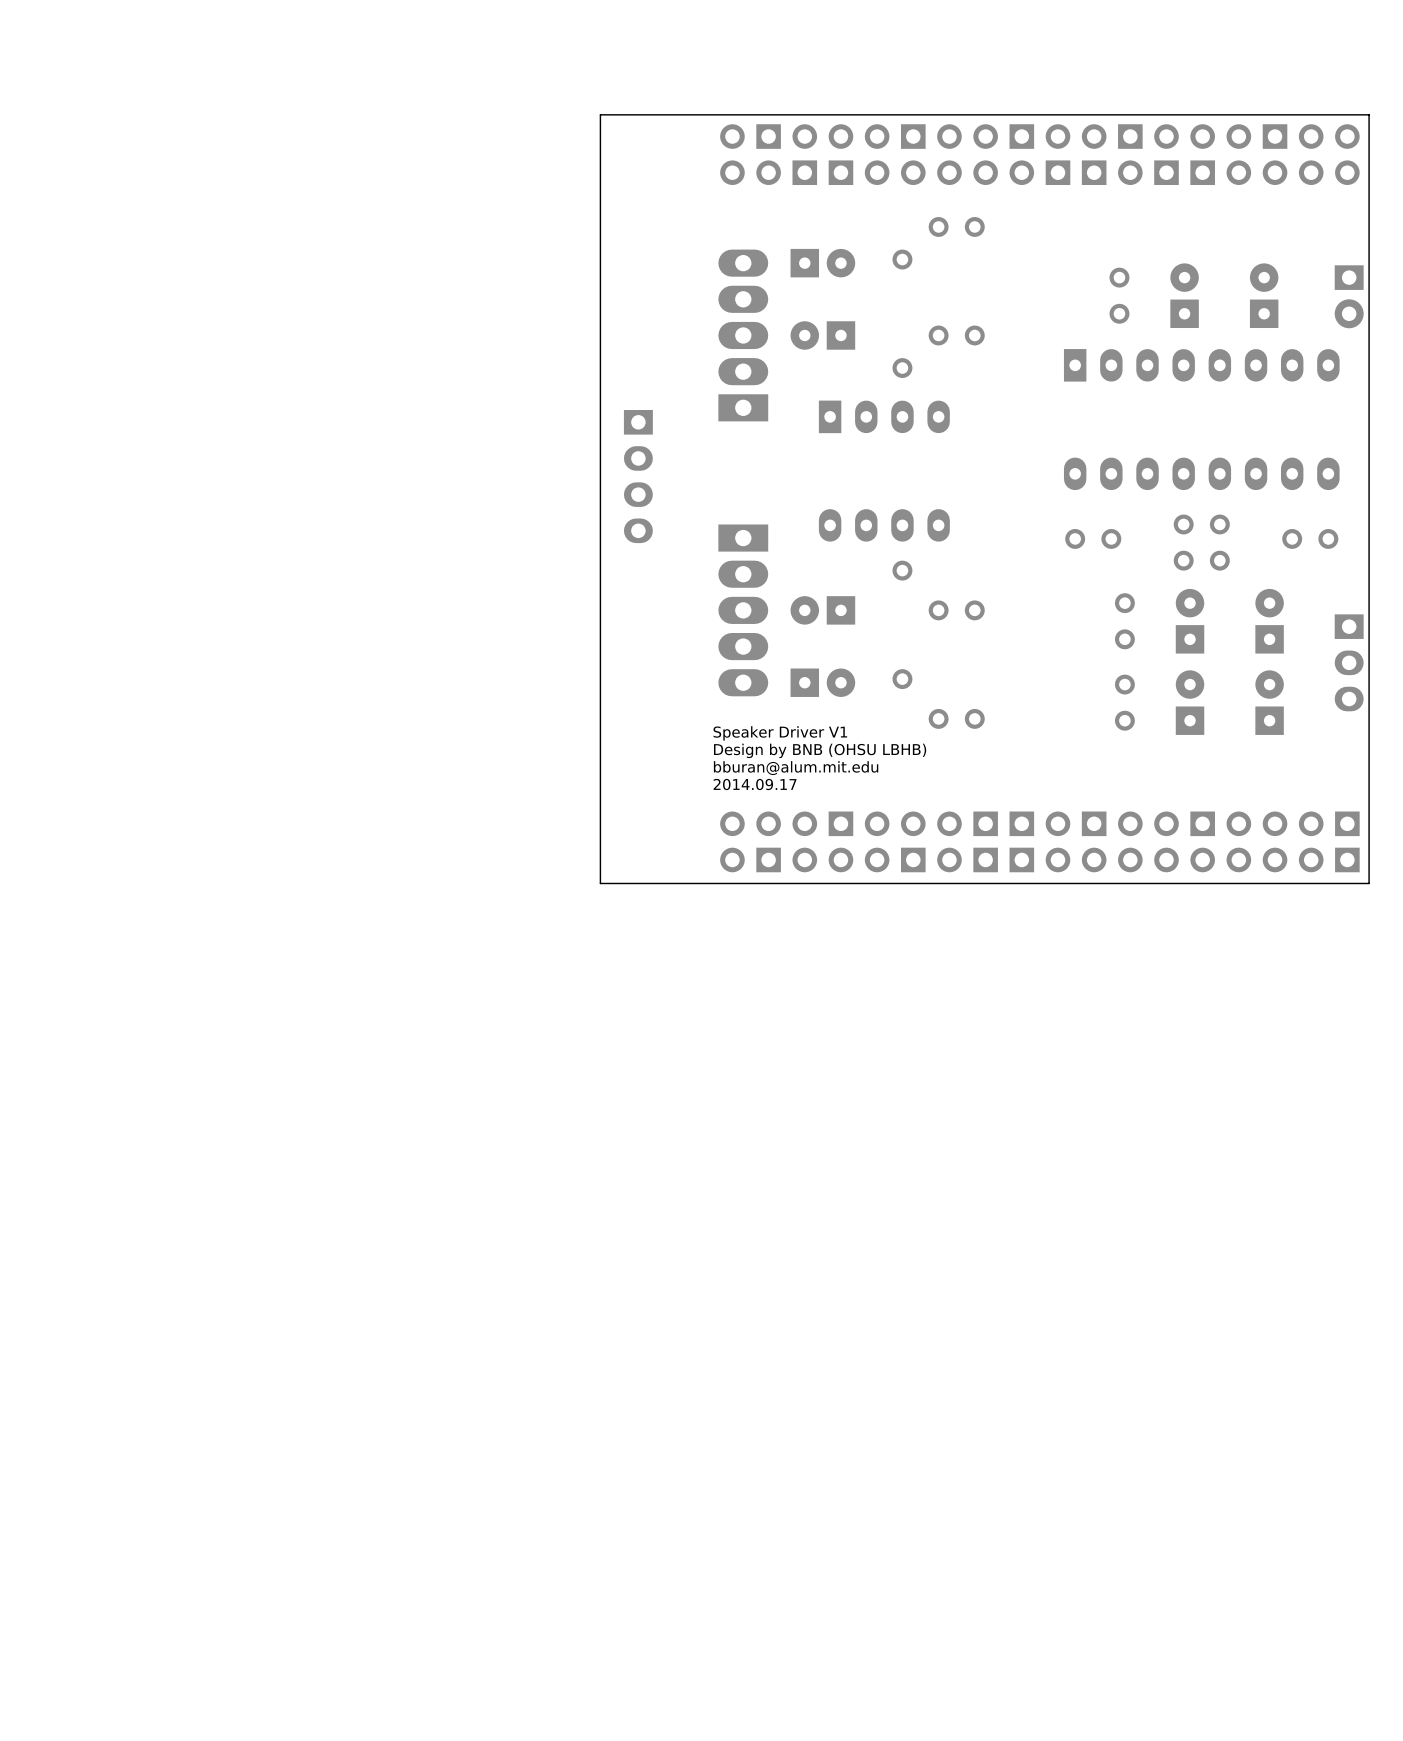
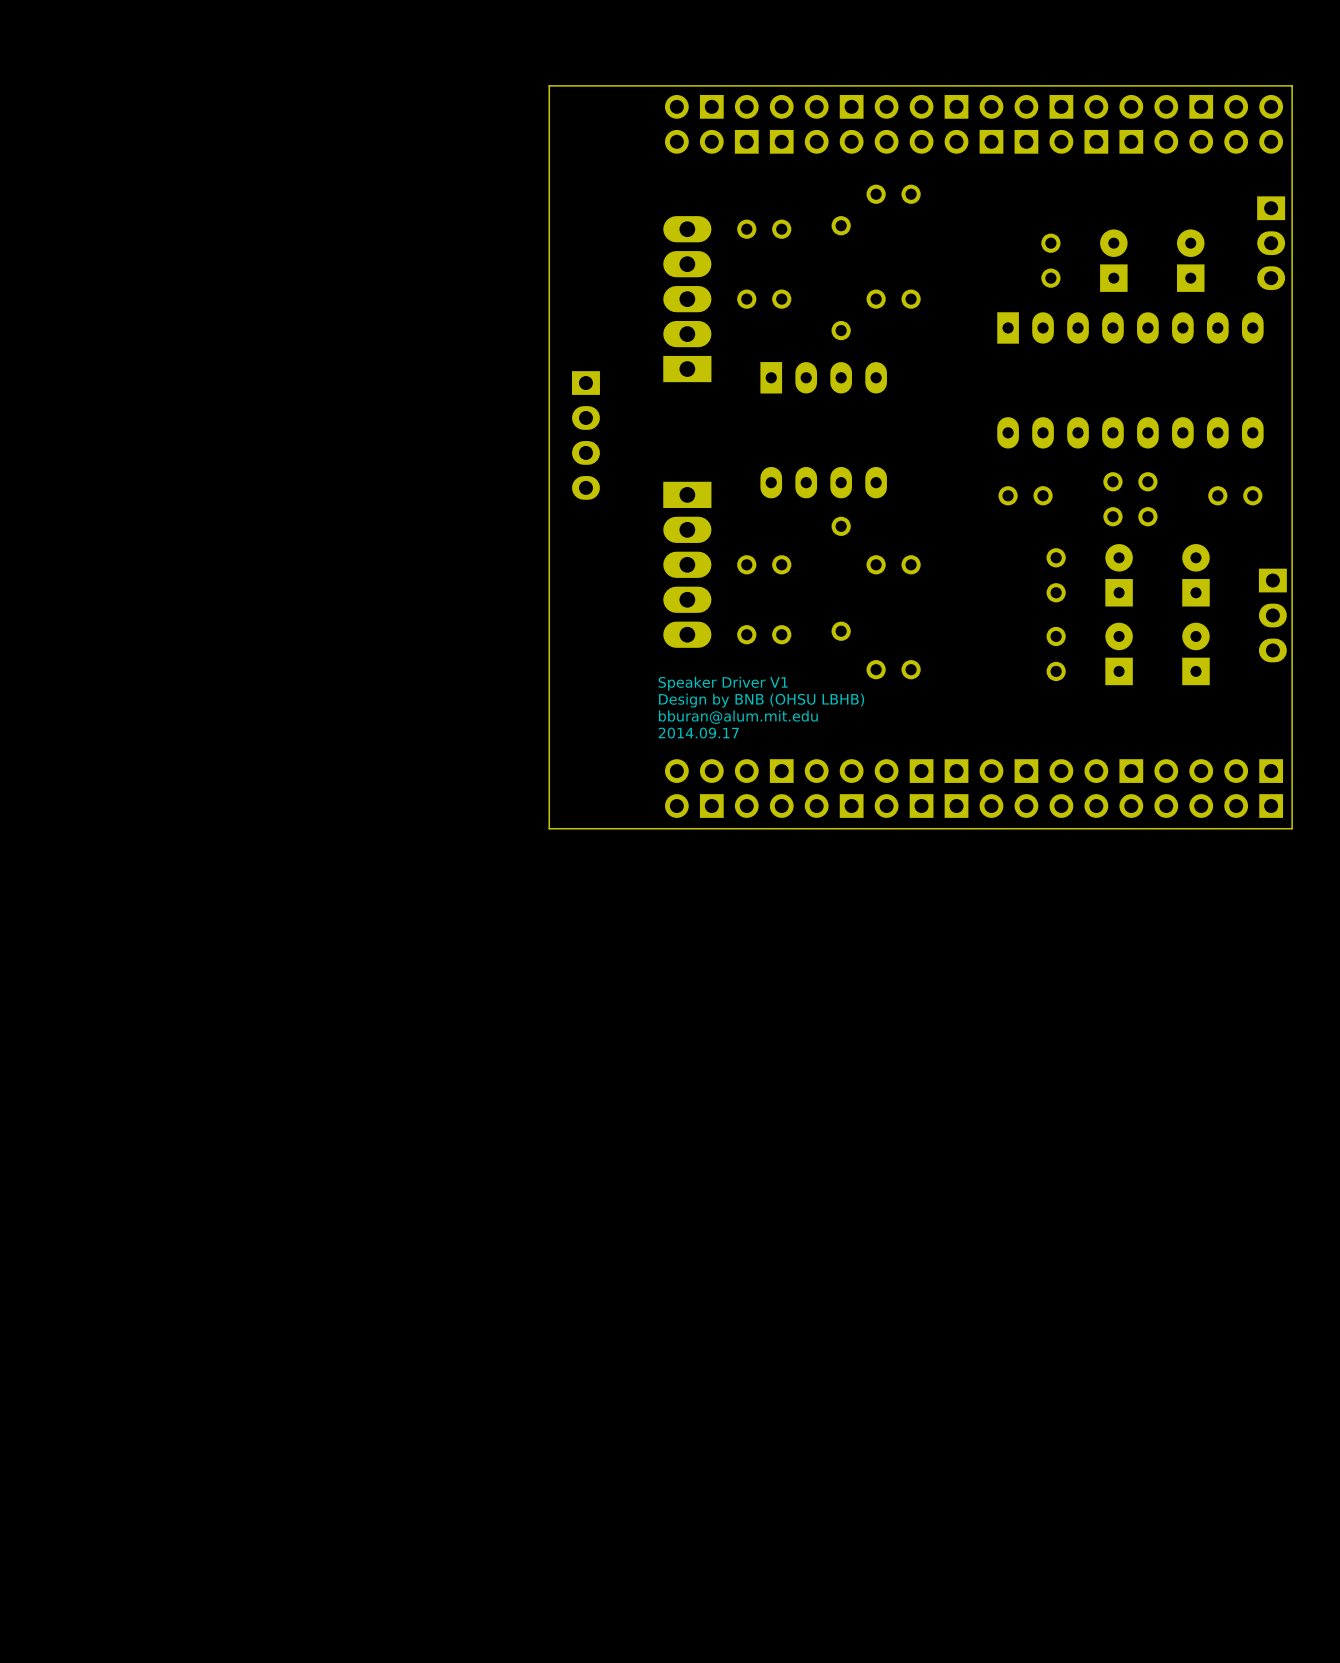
part footprint: [790, 248, 856, 278] -> [737, 219, 792, 239]
part: none -> (1271, 243)
part: (1349, 296) -> none
part footprint: [790, 321, 856, 350] -> [737, 289, 792, 309]
part footprint: [790, 596, 856, 625] -> [737, 555, 792, 575]
part footprint: [790, 668, 856, 697] -> [737, 625, 792, 645]

